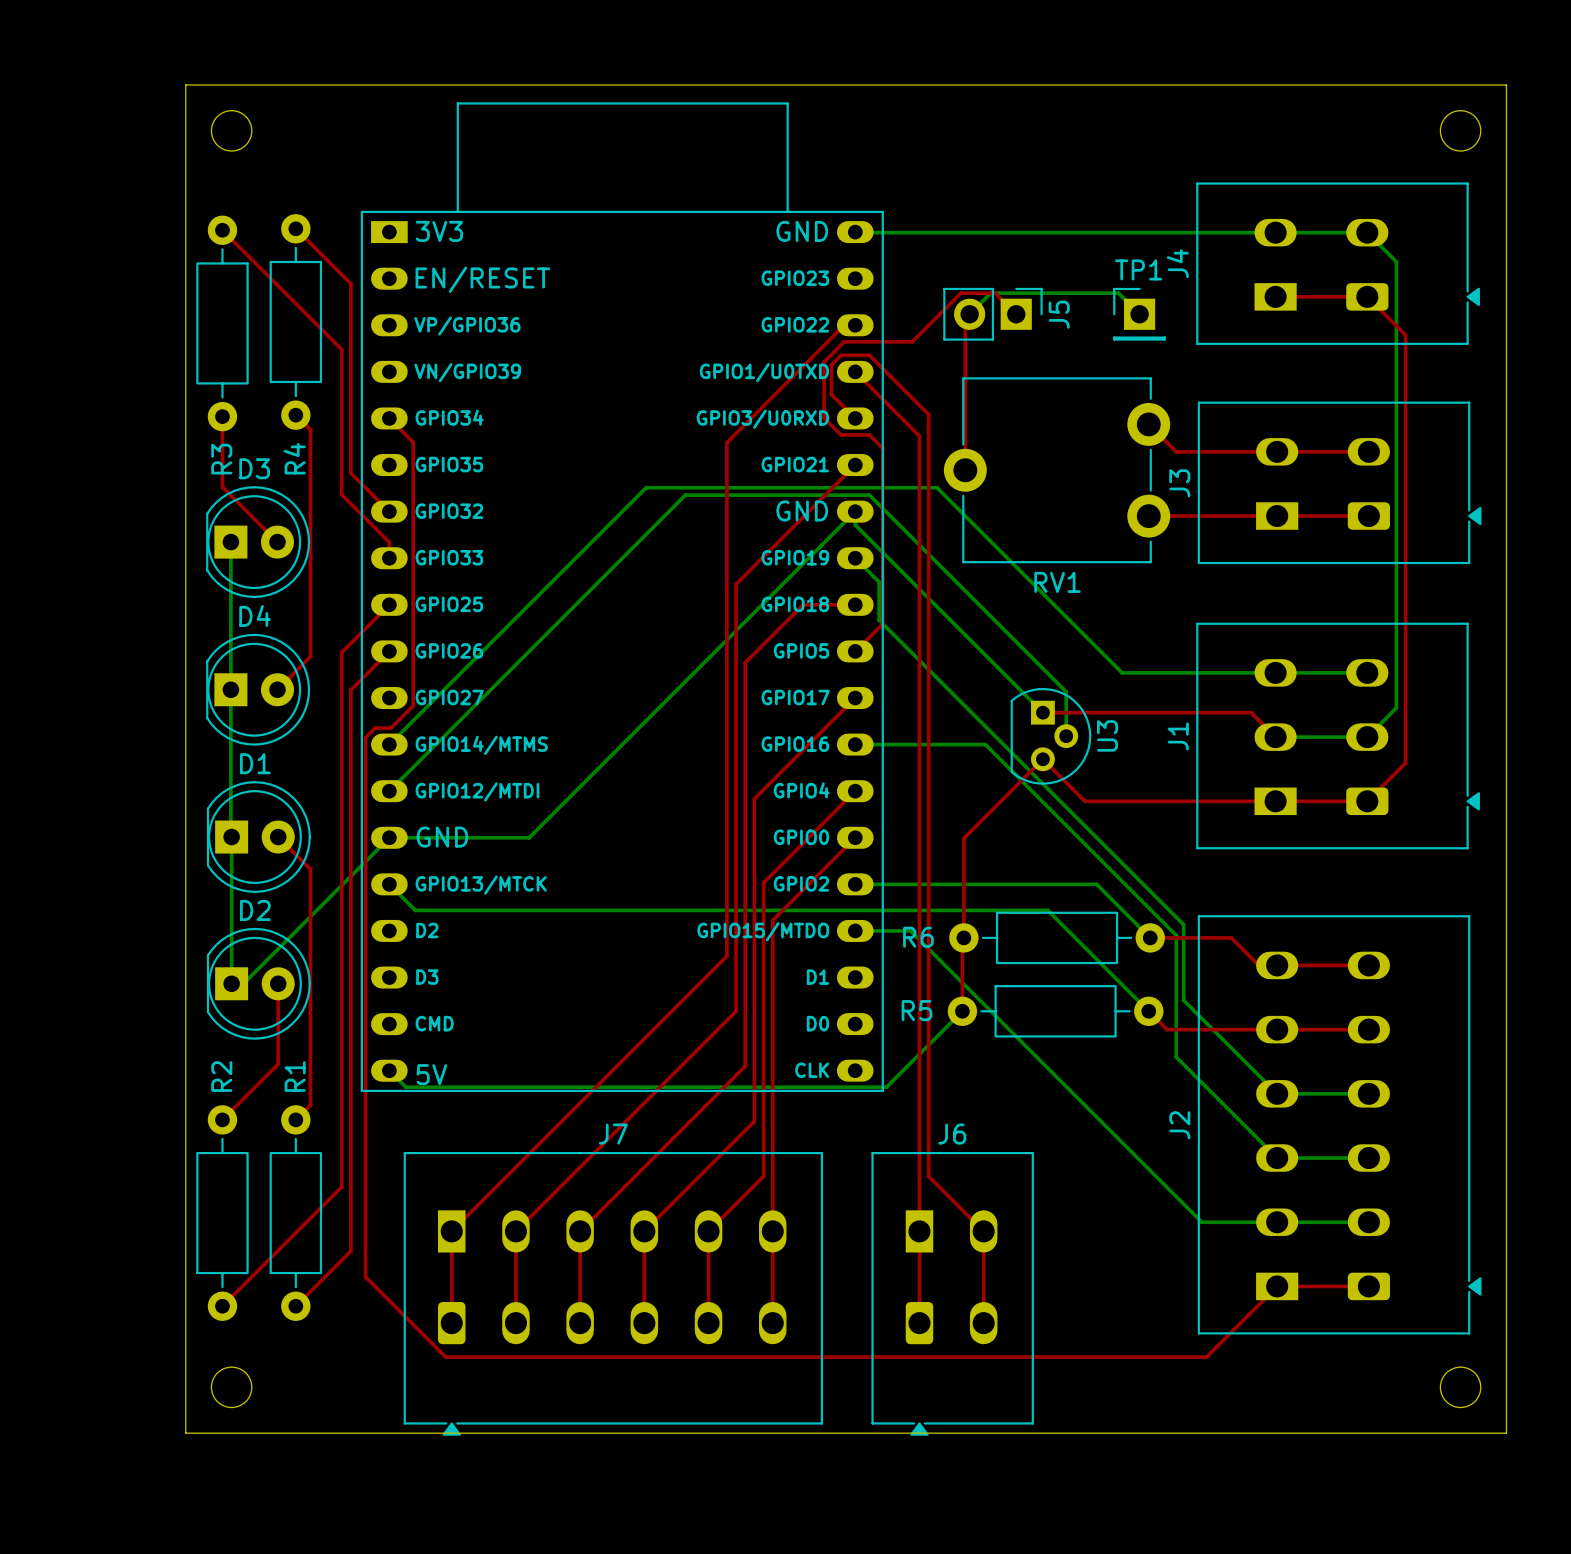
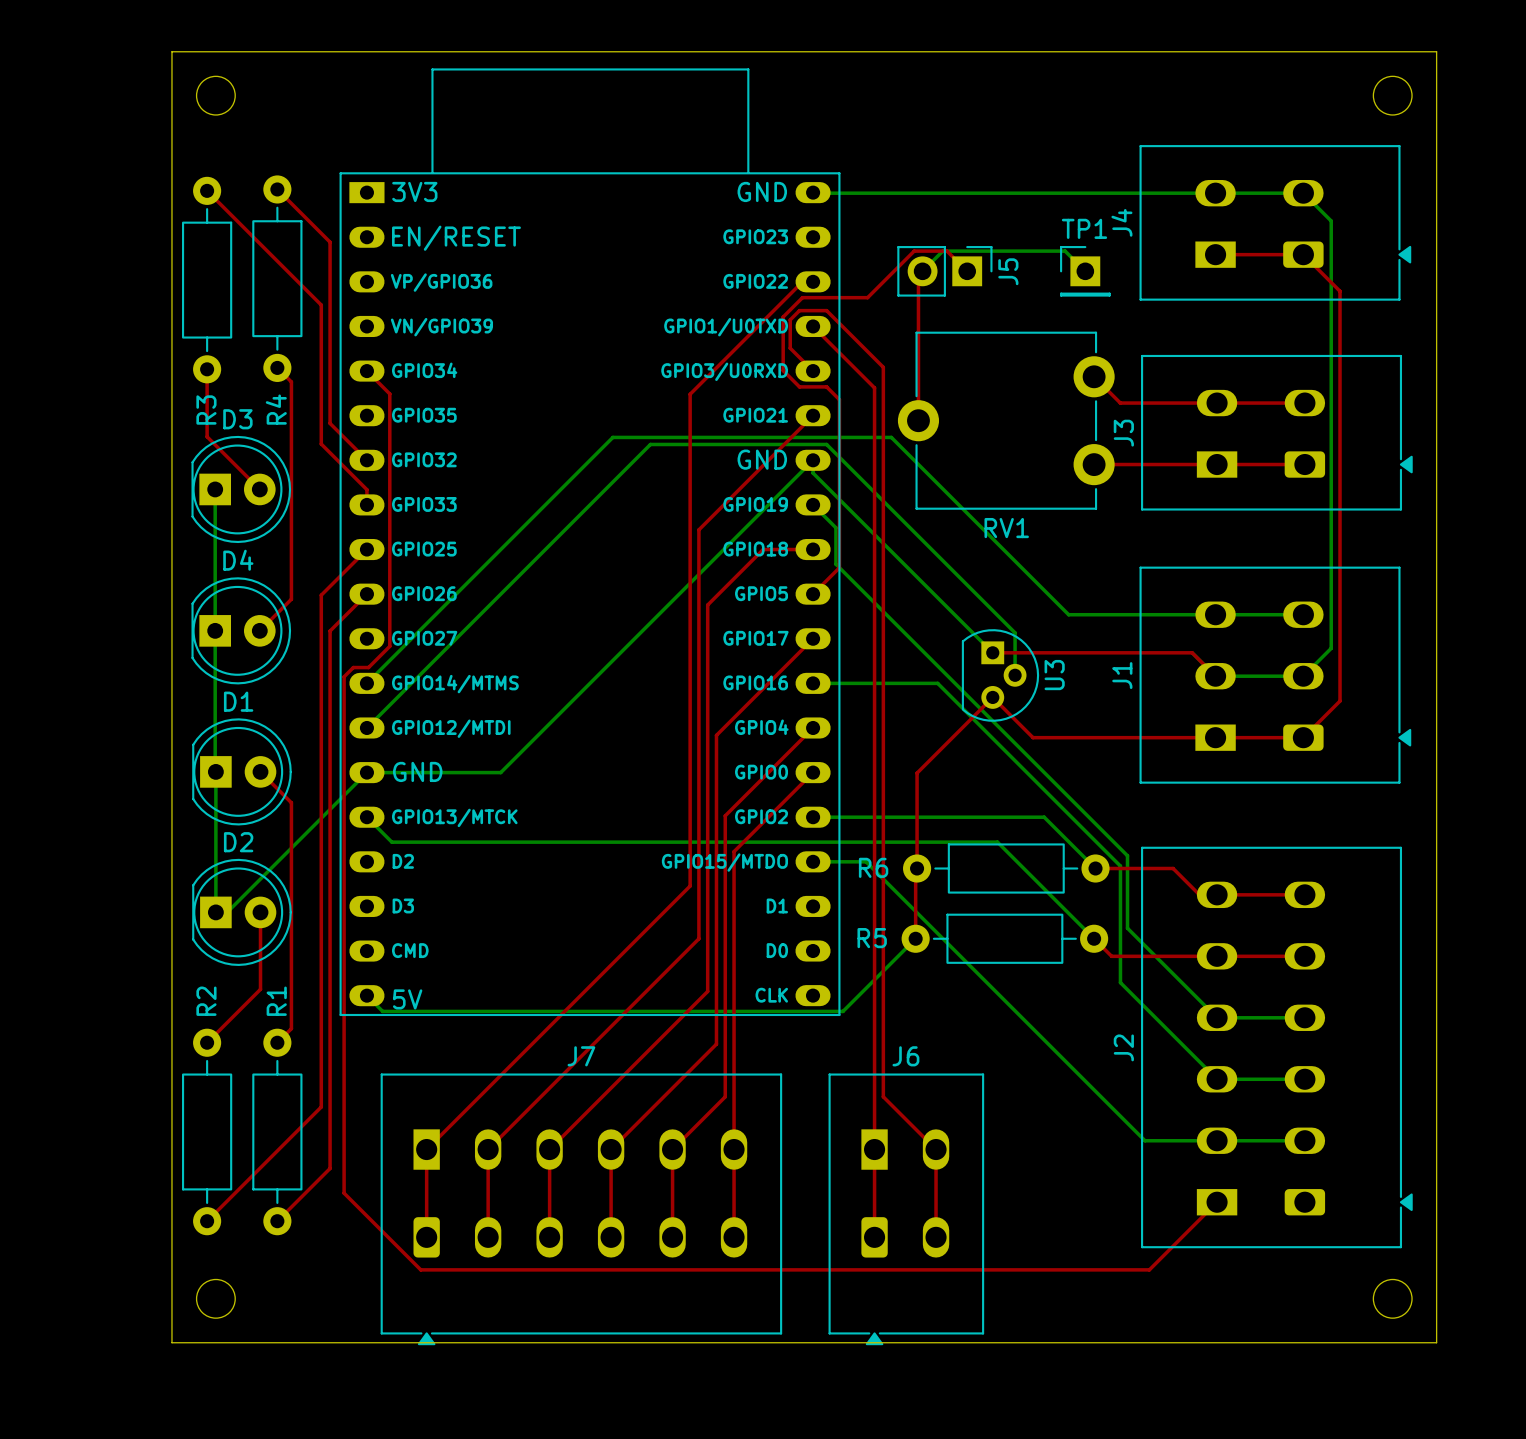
top track: (1277, 1286) (1368, 1286) -> none

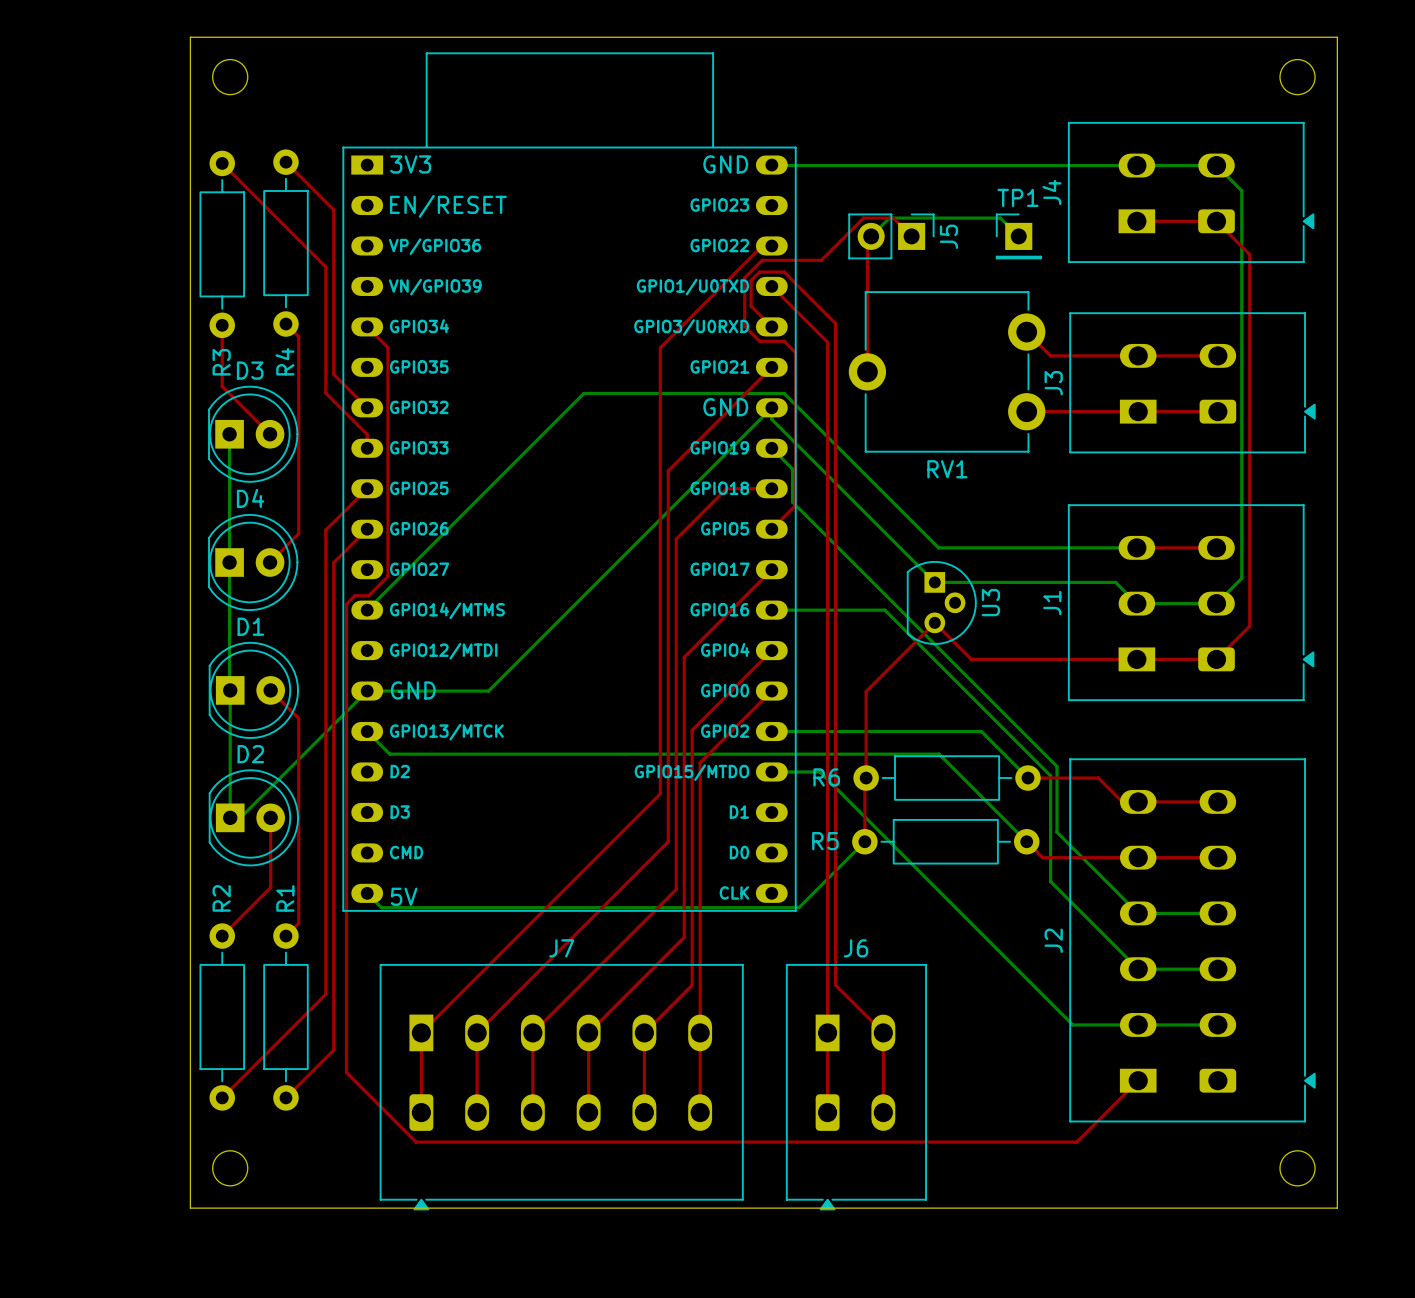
bottom track: (605, 444) (612, 437) (891, 437) (1068, 614) -> none
bottom track: (650, 444) (366, 727) -> (624, 393) (583, 393)
bottom track: (996, 614) (1015, 632) (1015, 675) -> (938, 547) (1003, 547)
top track: none -> (1136, 547) (1216, 547)
bottom track: (1215, 614) (1303, 614) -> none
top track: (992, 652) (1192, 652) (1215, 676) -> none
bottom track: none -> (934, 582) (1115, 582)

